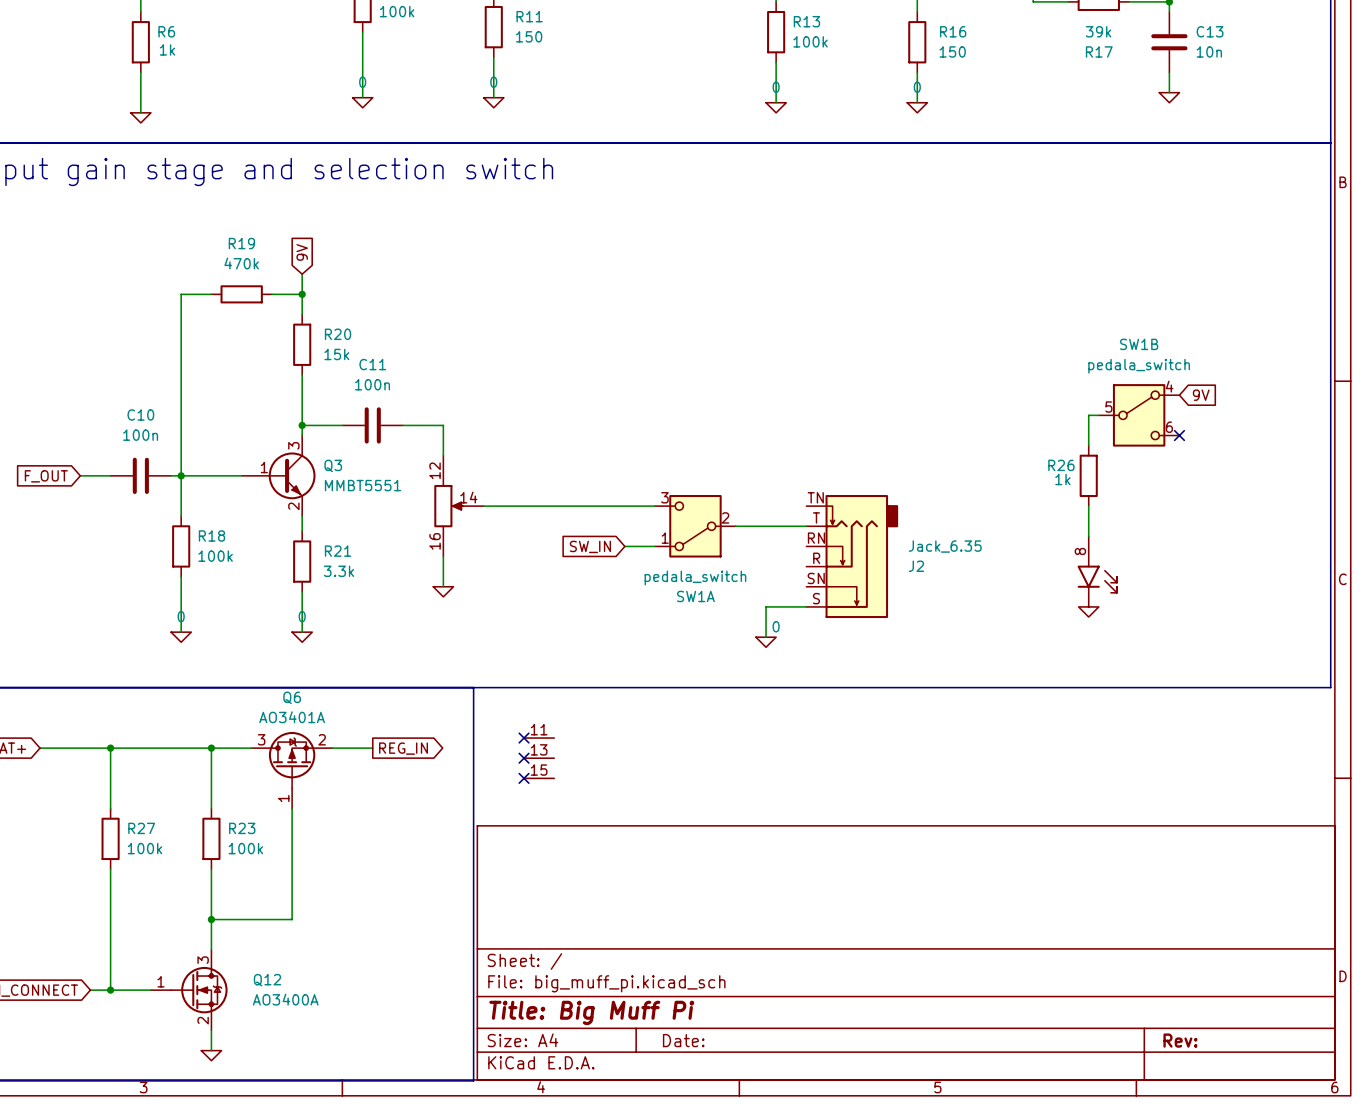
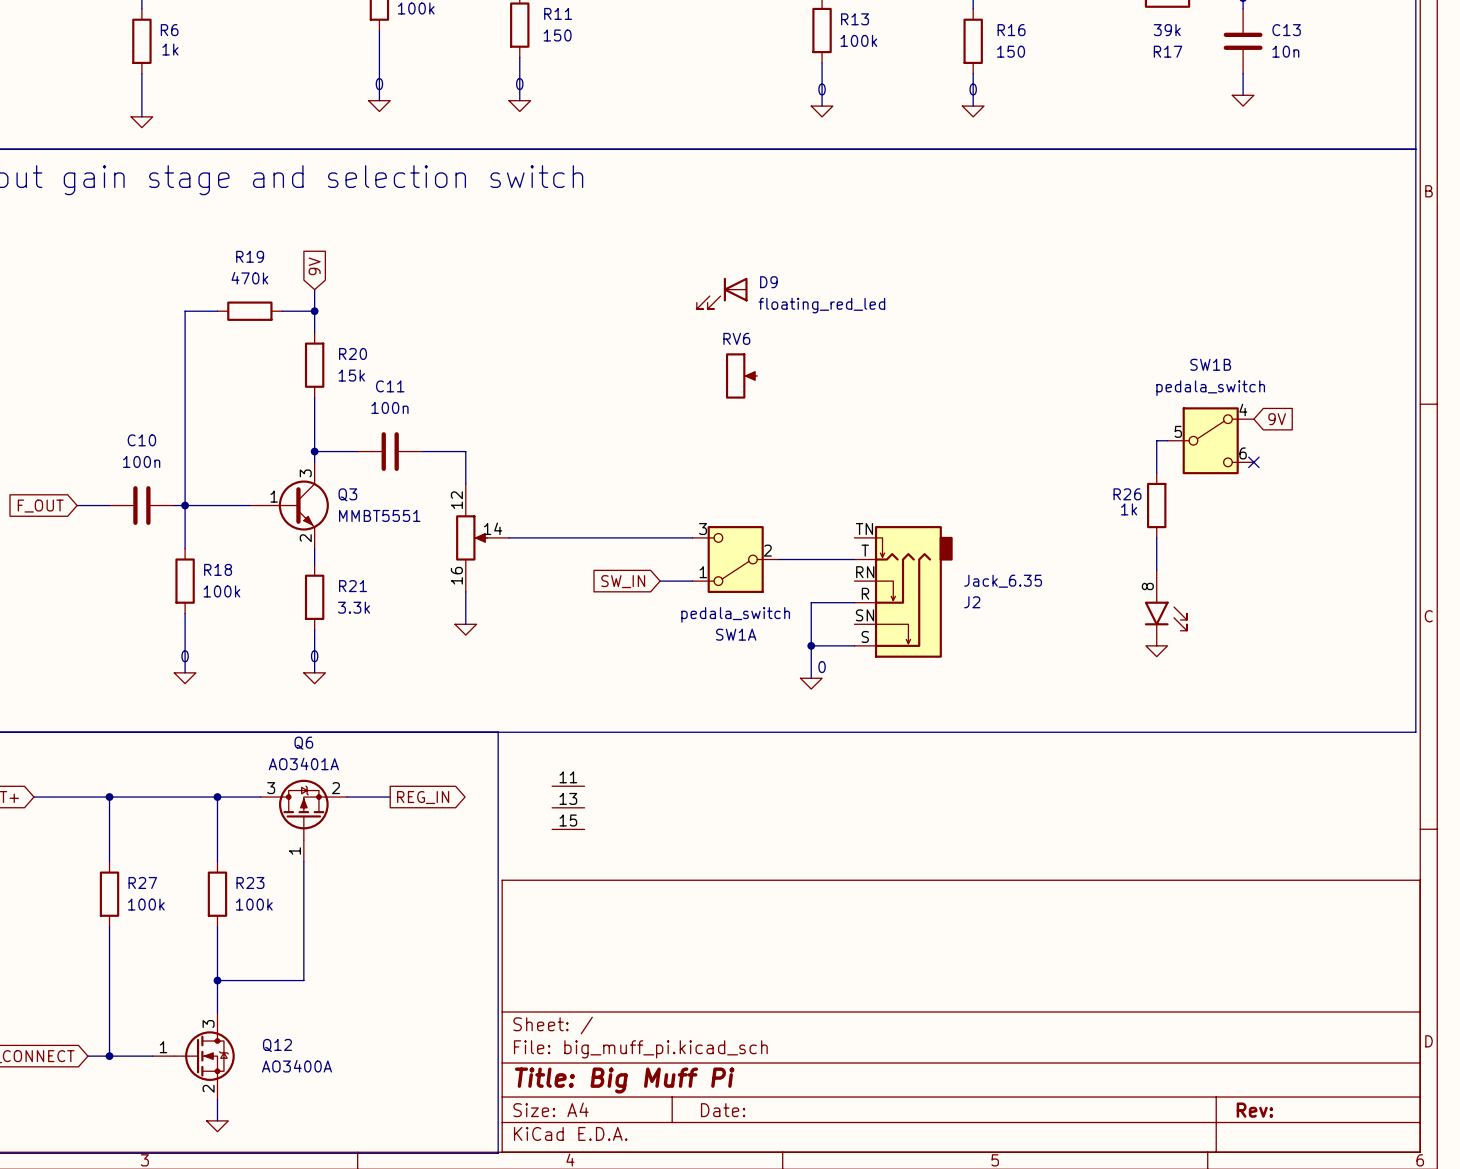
D9: none -> floating_red_led (722, 293)
RV6: none -> (741, 375)
wire: none -> (854, 602) (811, 602) (811, 645)
junction: none -> (811, 645)
no-connect mark: (524, 738) -> none
no-connect mark: (524, 758) -> none
no-connect mark: (524, 778) -> none

